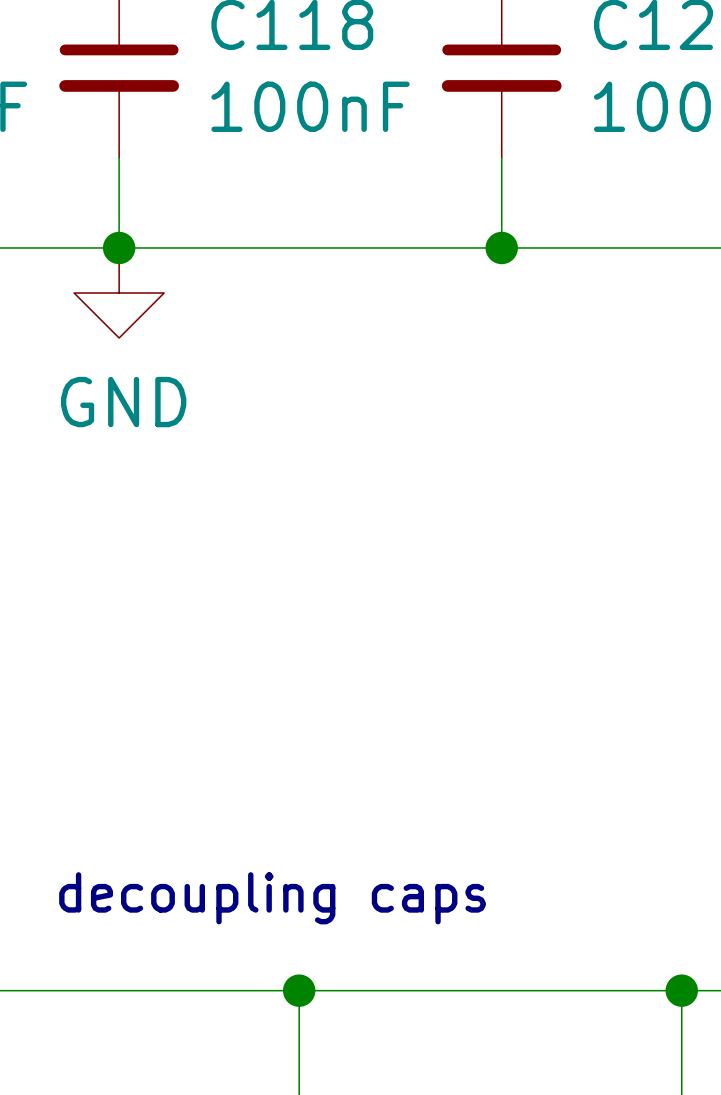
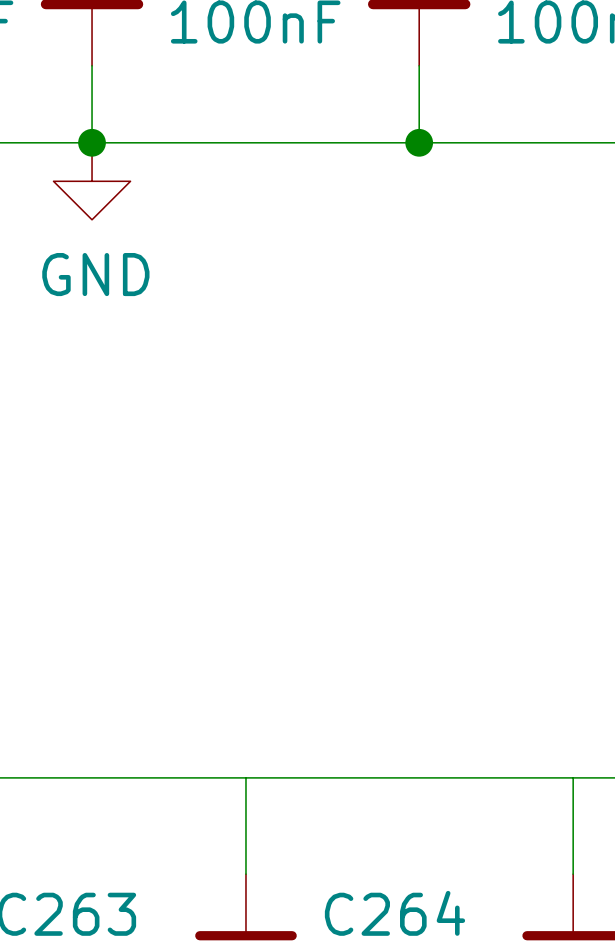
text: decoupling caps (272, 898) -> none
junction: (299, 990) -> none
junction: (681, 990) -> none

